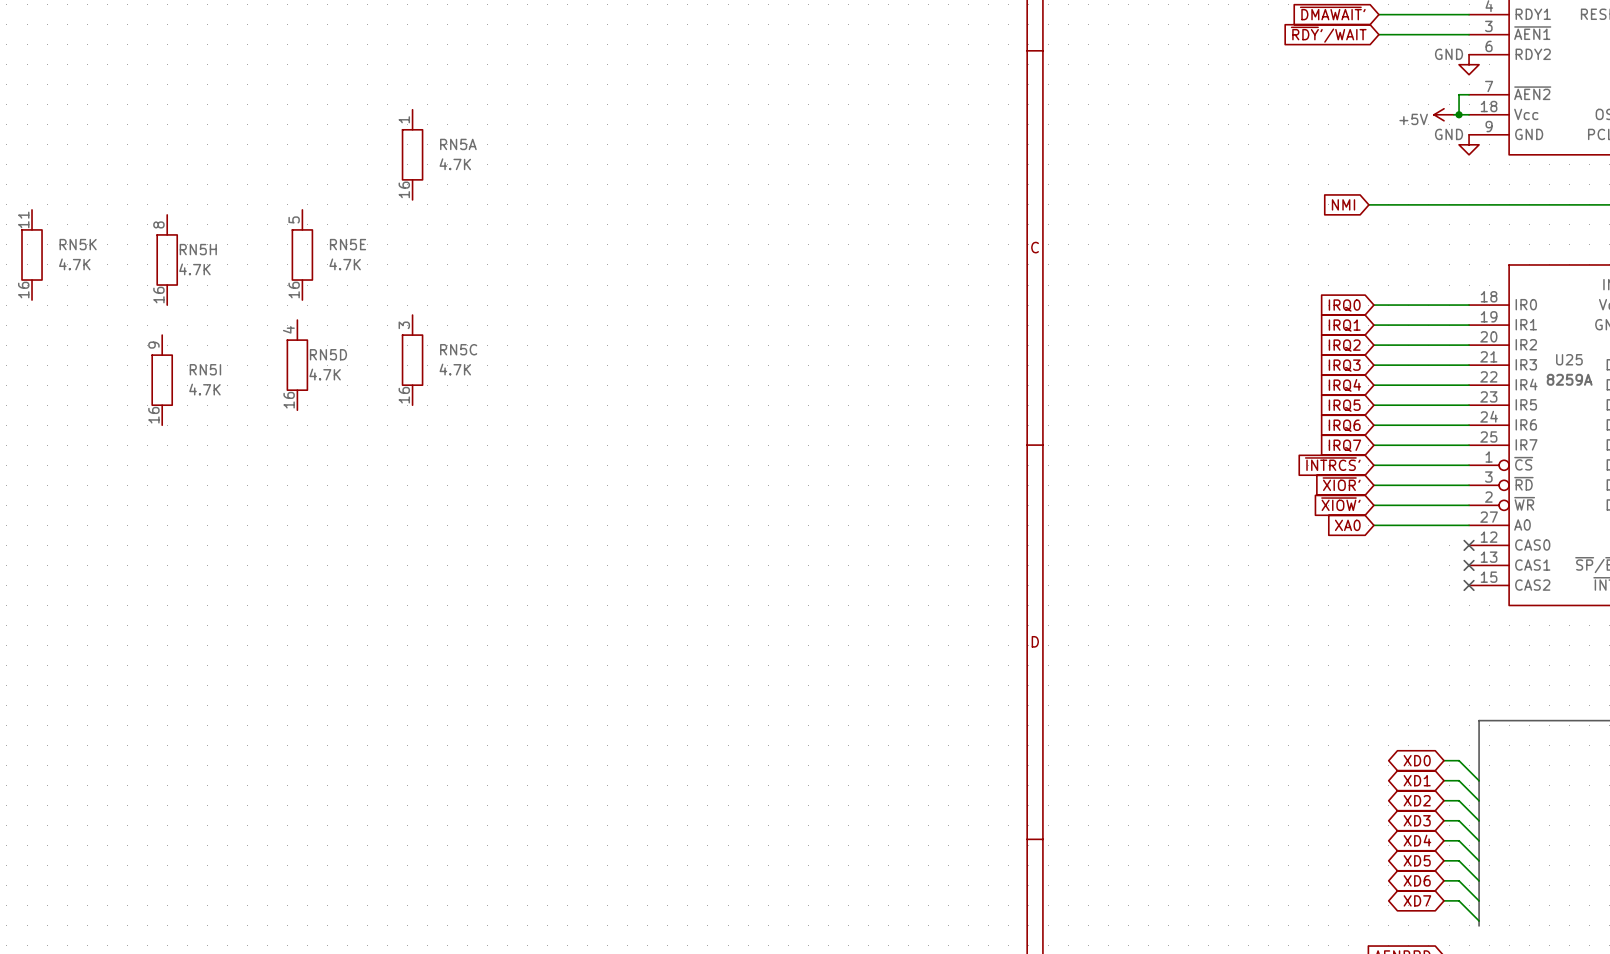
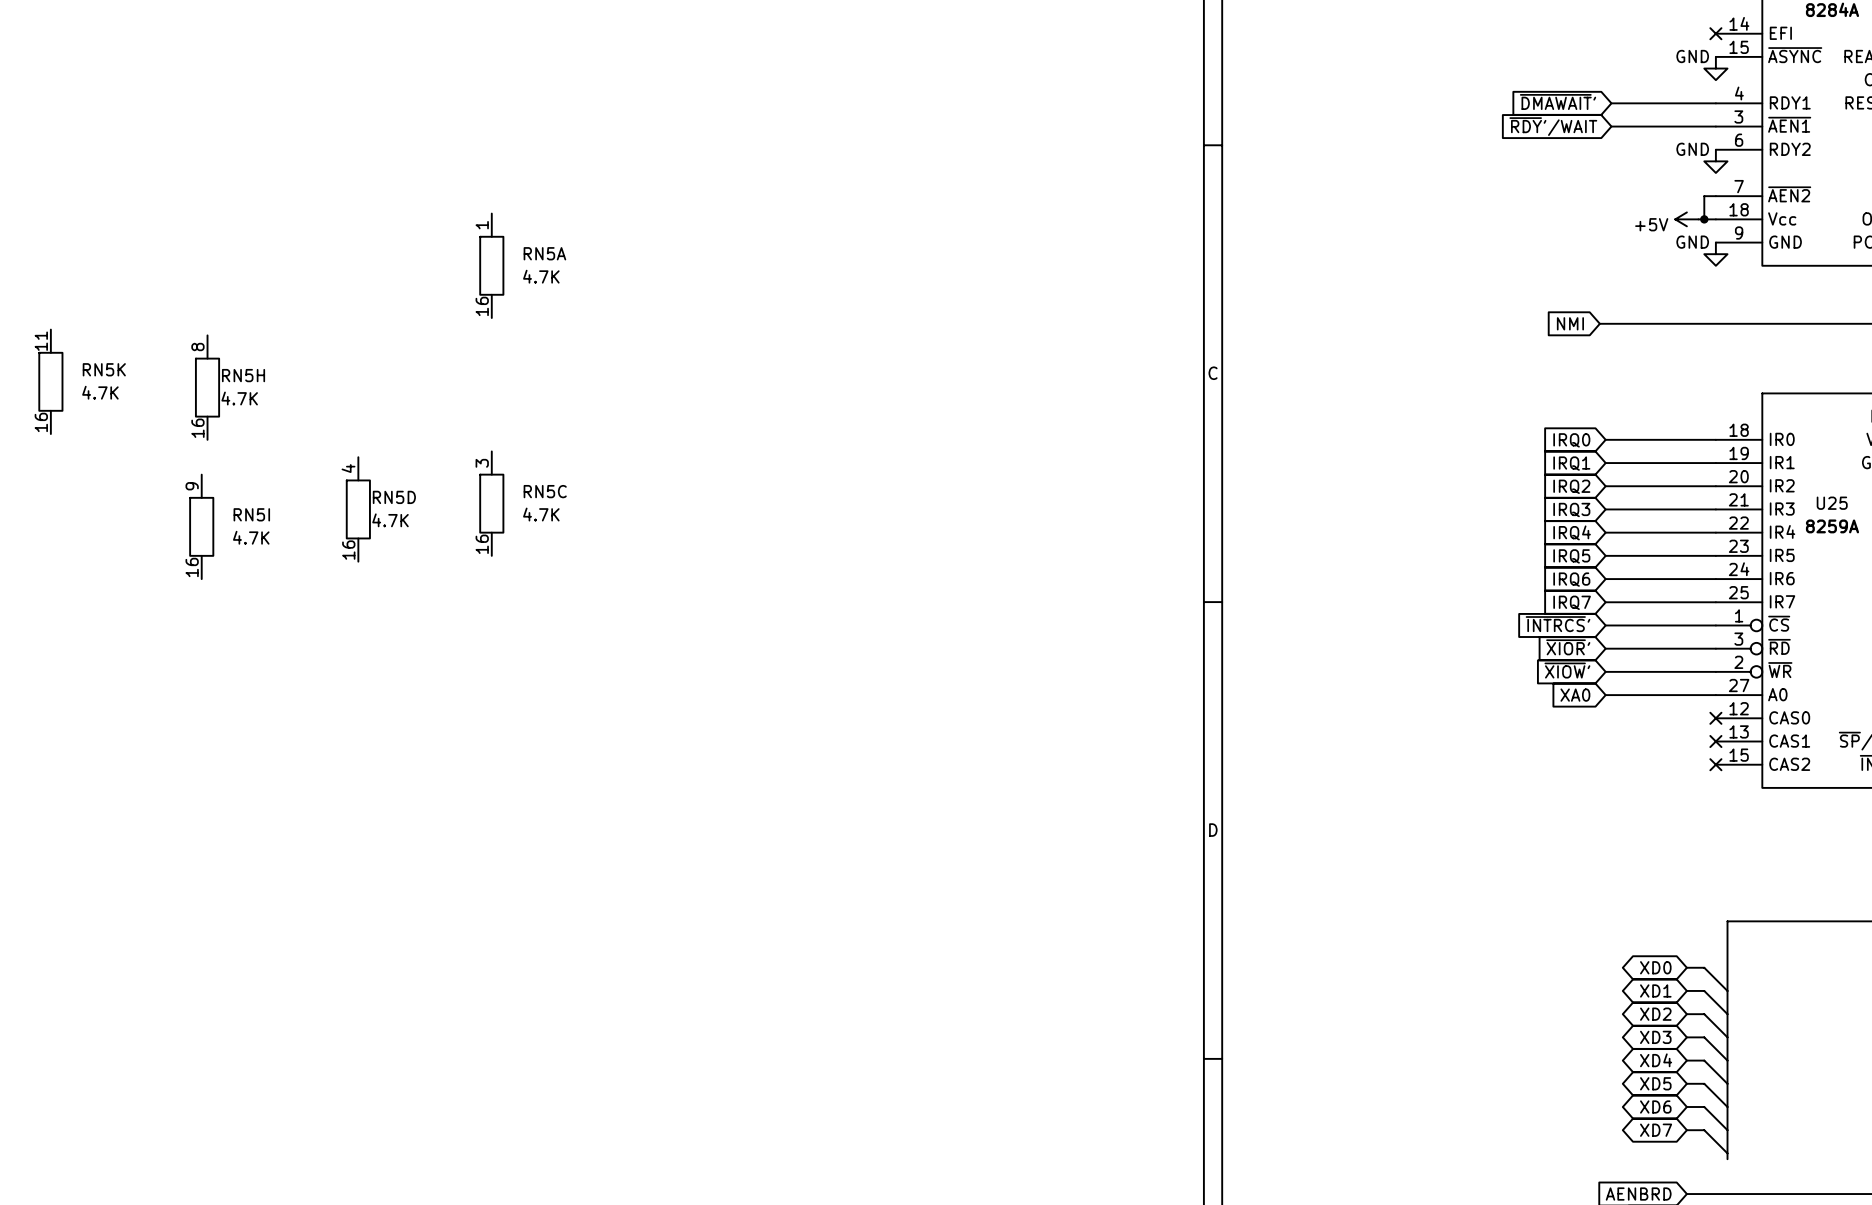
RN5E: 4.7K (302, 254) -> none

